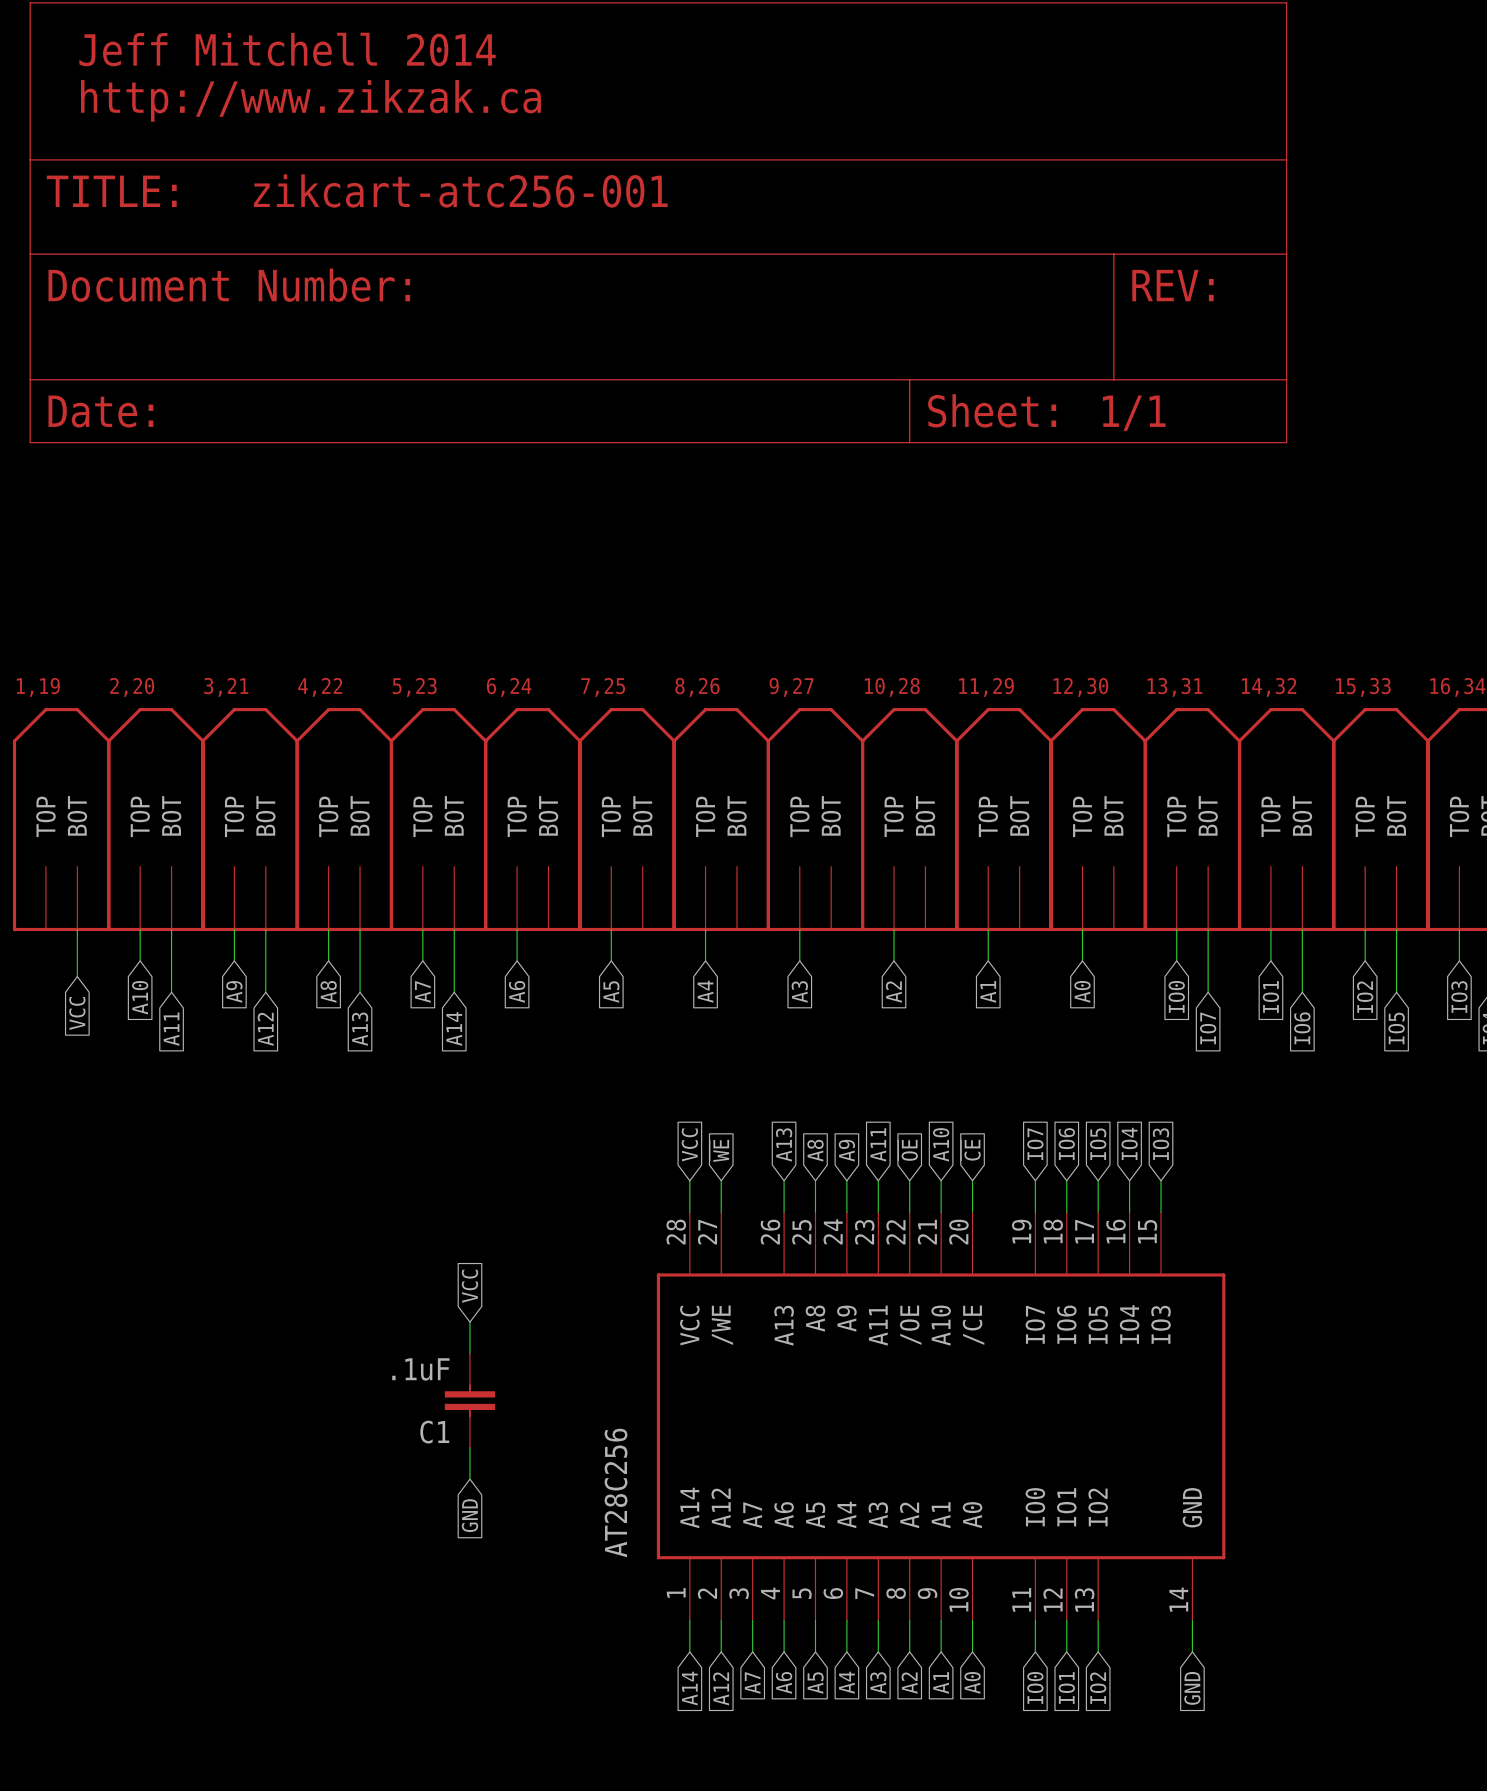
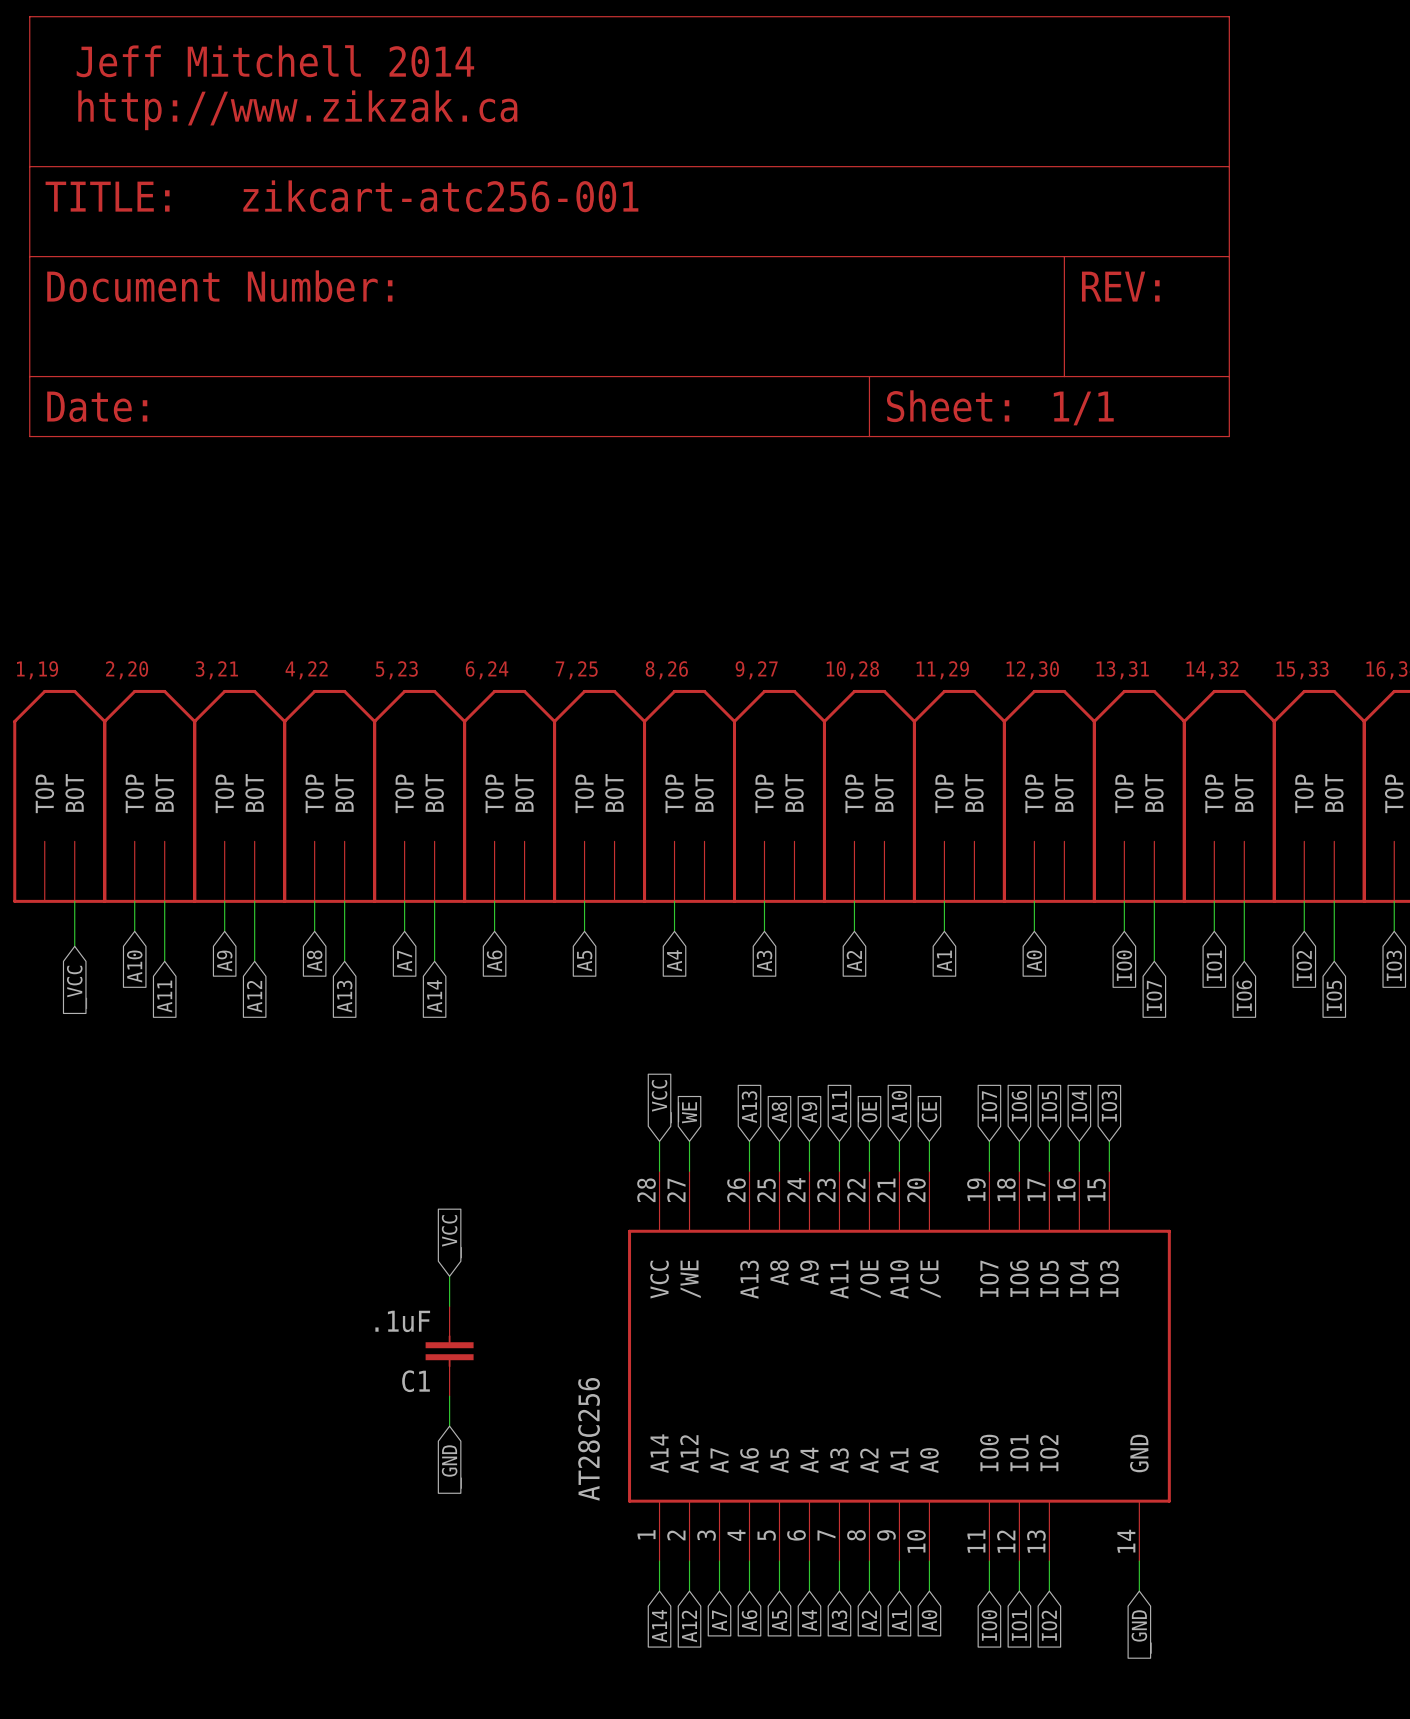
global label: VCC (77, 1013) -> _VCC (77, 987)
global label: VCC (689, 1144) -> _VCC (661, 1101)
global label: VCC (469, 1286) -> _VCC (451, 1236)
global label: GND (469, 1515) -> _GND (451, 1467)
global label: GND (1192, 1688) -> _GND (1141, 1631)

